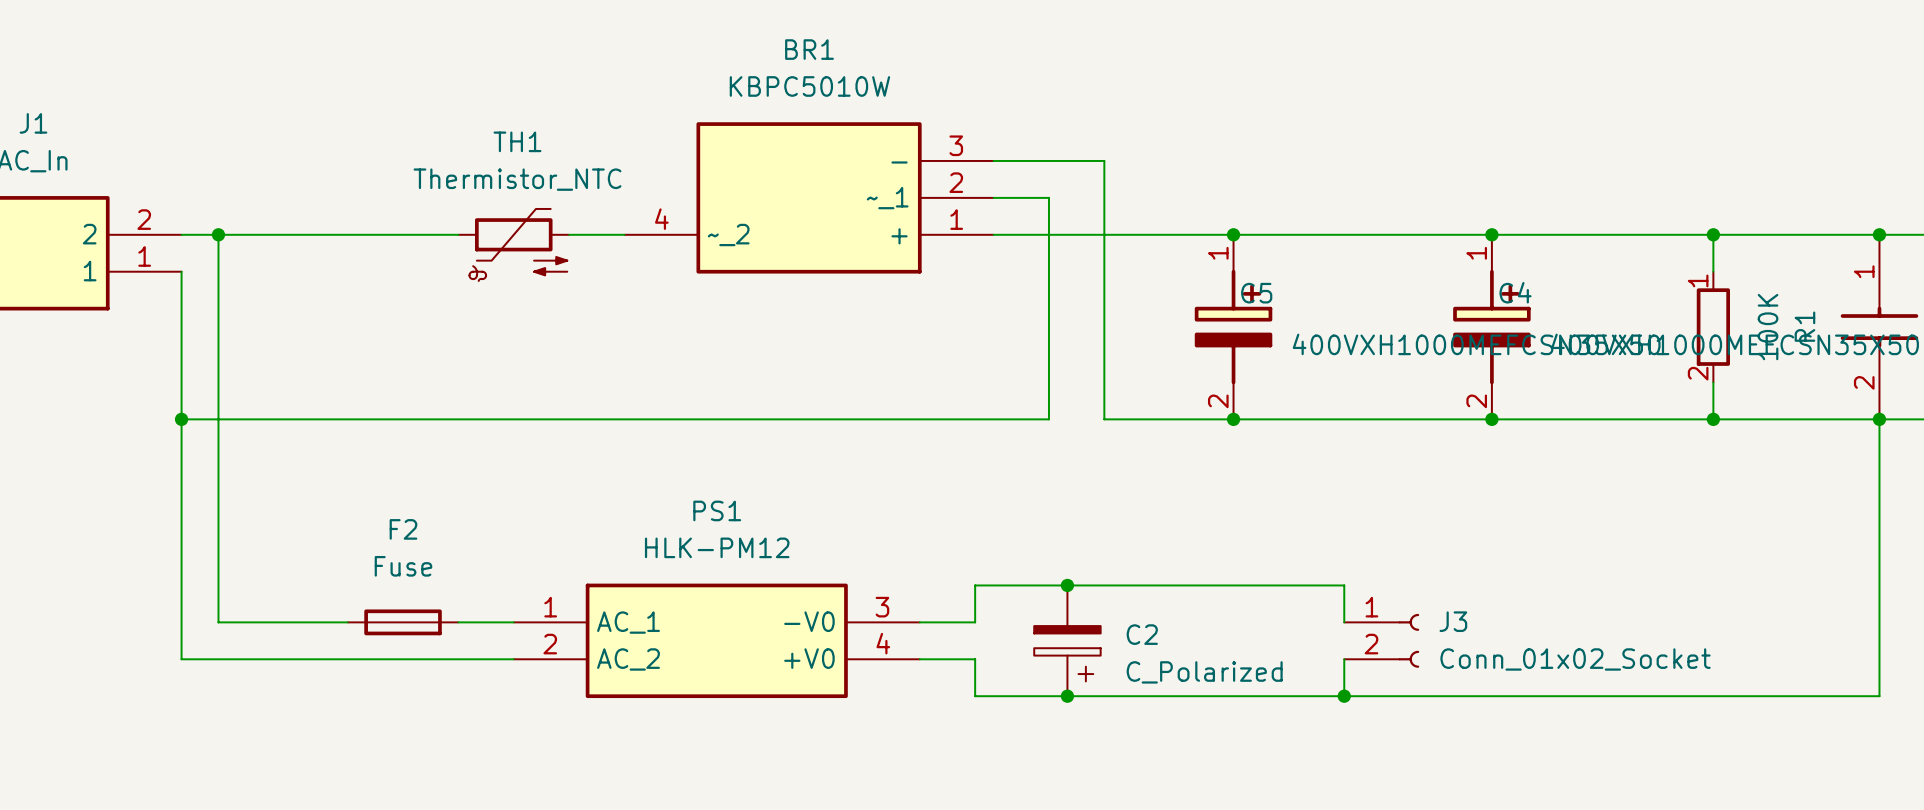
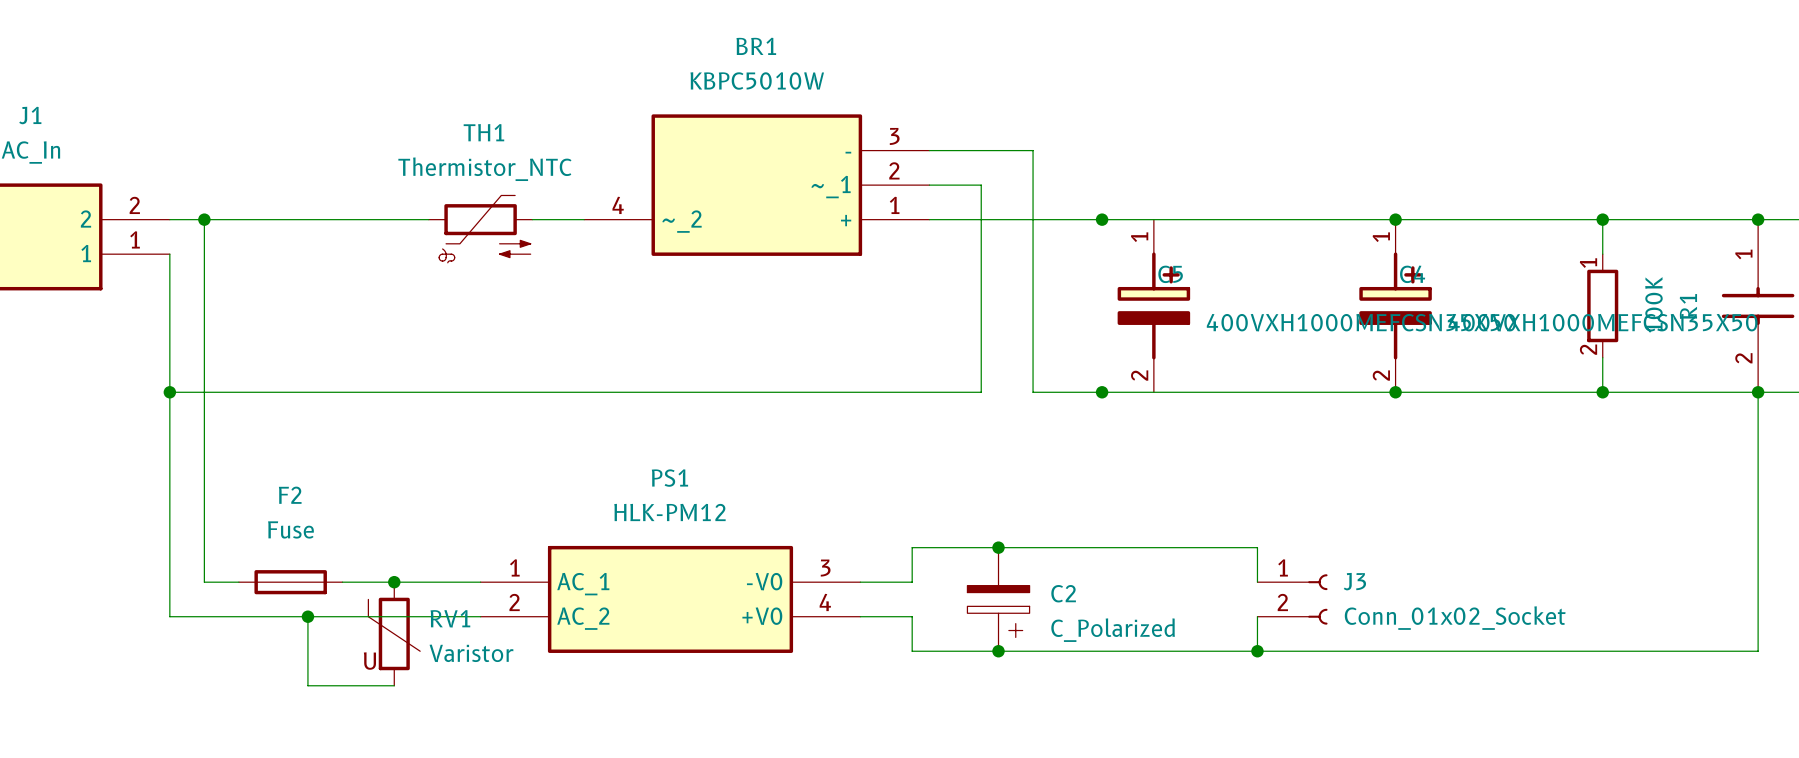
junction position: (1233, 234) -> (1102, 219)
junction position: (1233, 419) -> (1102, 392)
F2 position: (403, 622) -> (290, 582)
junction: none -> (394, 582)
wire: none -> (307, 616) (307, 685) (394, 685)
junction: none -> (307, 616)
RV1: none -> Varistor (394, 633)

